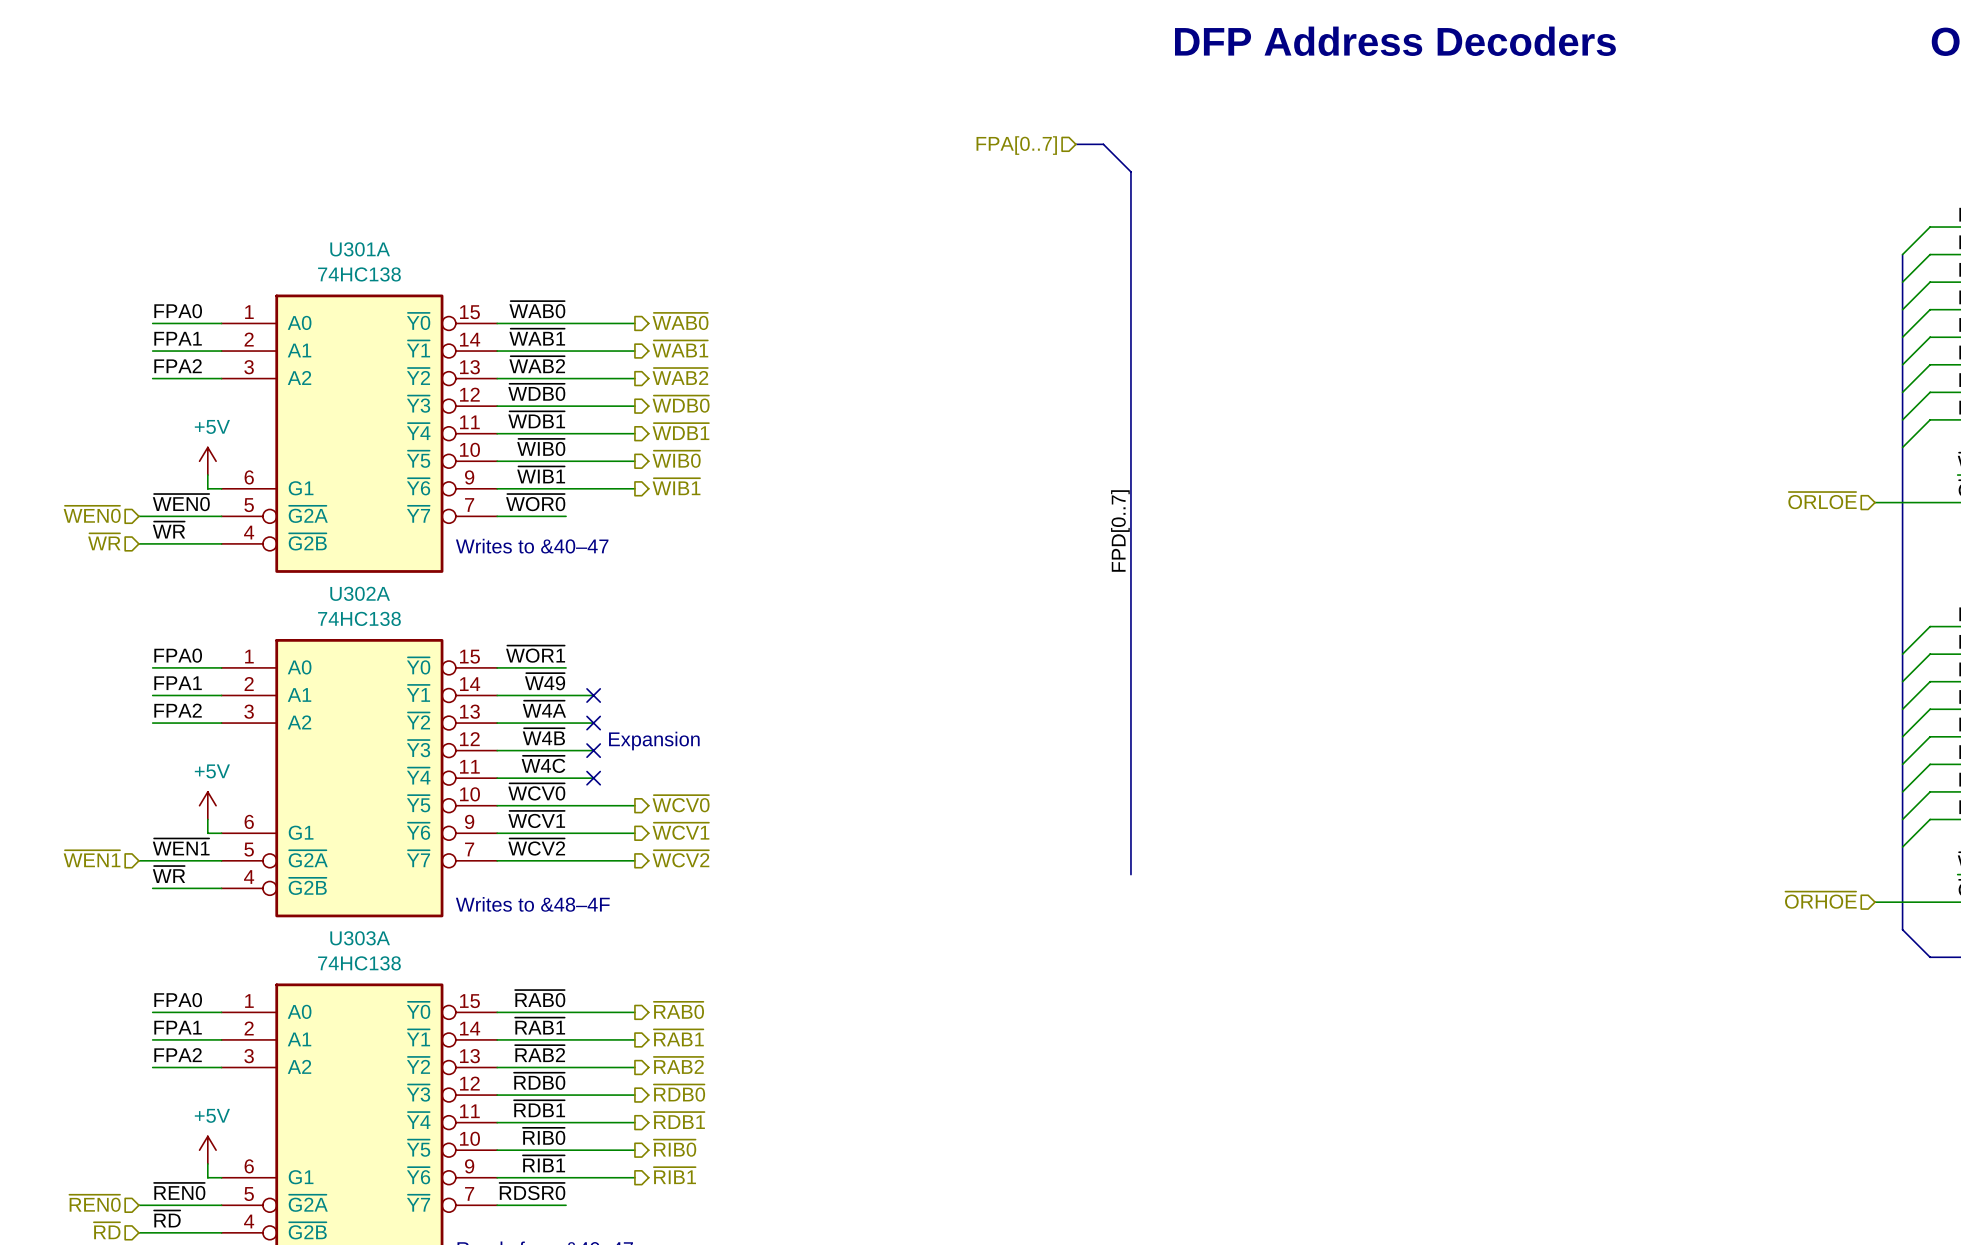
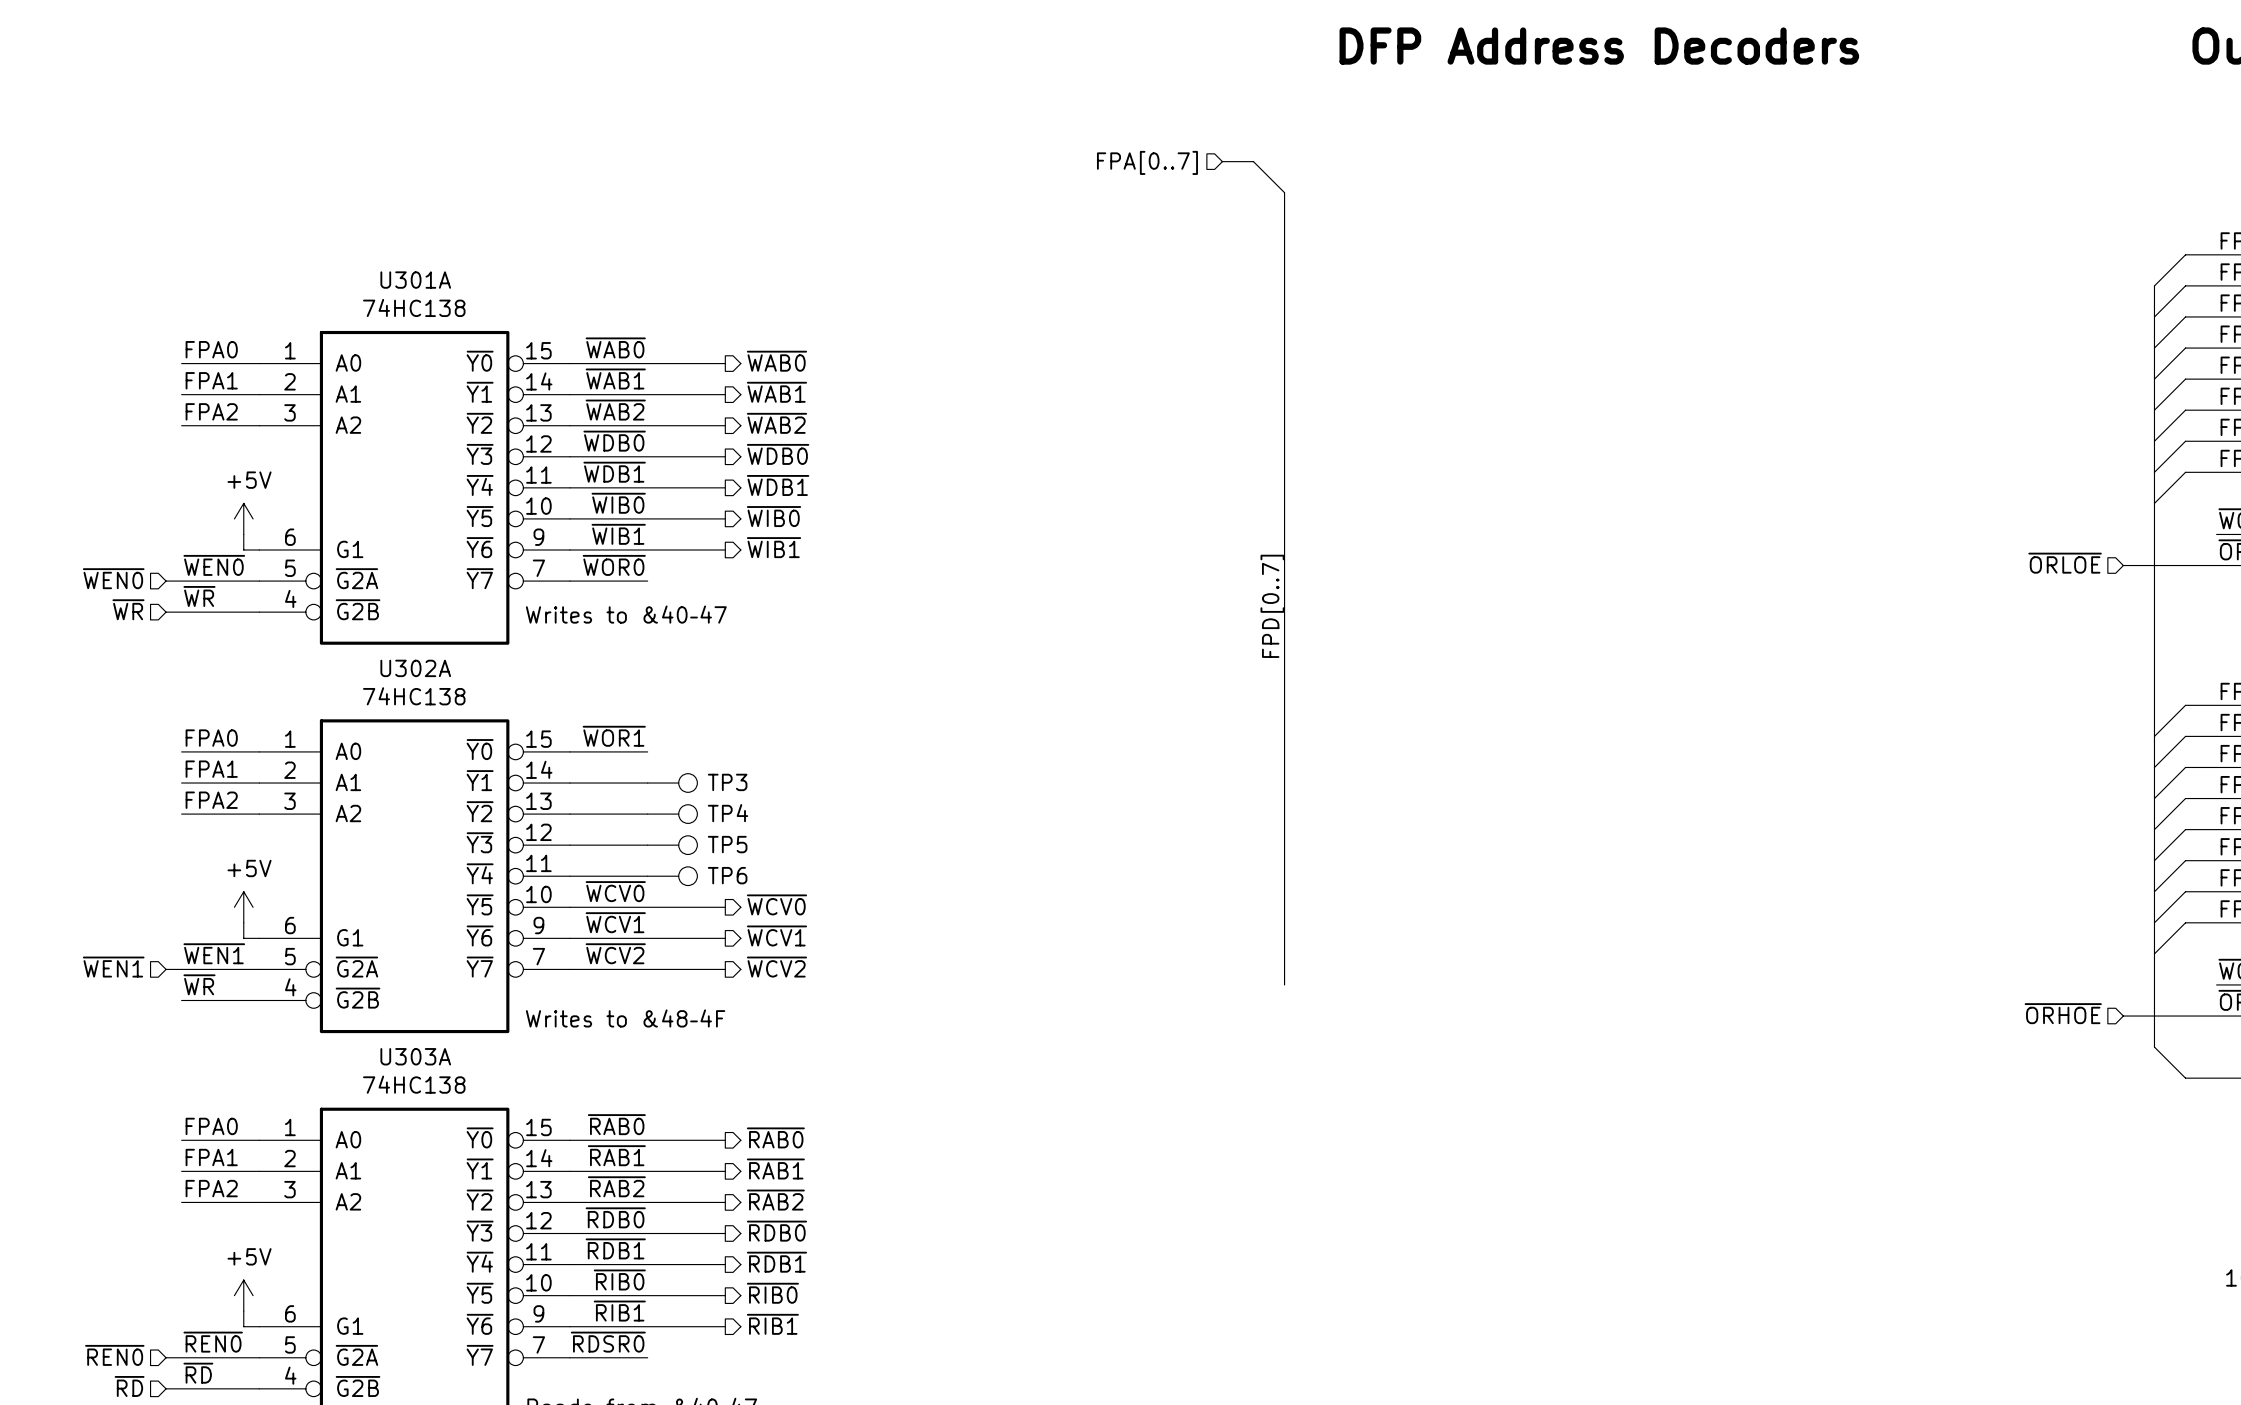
label: ~{W49} (545, 681) -> none
TP3: none -> (672, 783)
no-connect mark: (593, 695) -> none
label: ~{W4A} (544, 709) -> none
TP4: none -> (672, 814)
no-connect mark: (593, 723) -> none
label: ~{W4B} (543, 736) -> none
text: Expansion (654, 741) -> none
TP5: none -> (672, 845)
no-connect mark: (593, 750) -> none
label: ~{W4C} (543, 764) -> none
TP6: none -> (672, 876)
no-connect mark: (593, 778) -> none

